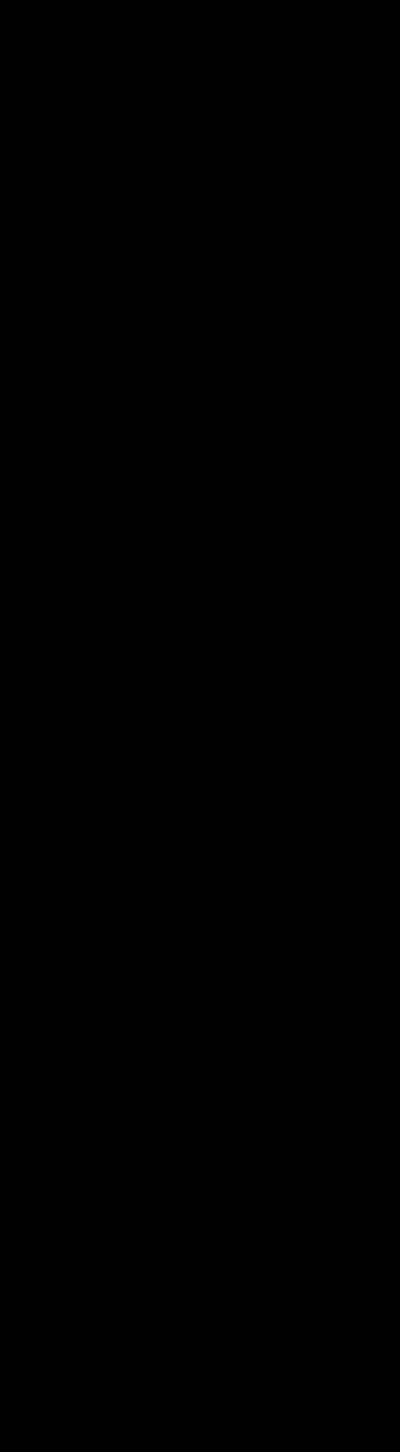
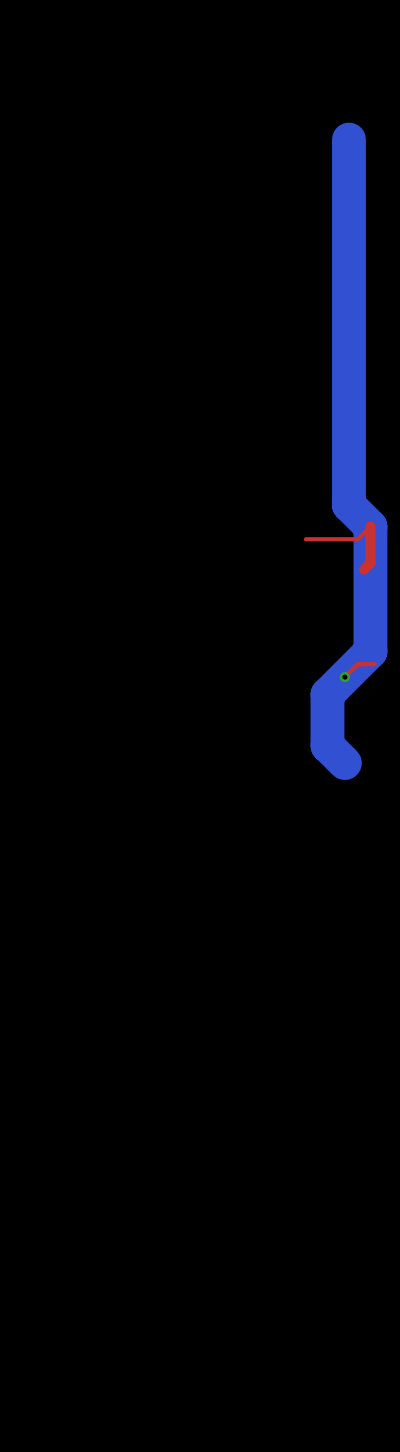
bottom track: none -> (348, 139) (348, 505) (370, 526) (370, 651) (327, 694) (327, 745) (344, 763)
top track: none -> (305, 539) (357, 539) (370, 526) (370, 563) (364, 569)
top track: none -> (374, 664) (357, 664) (344, 677)
via: none -> (344, 677)

